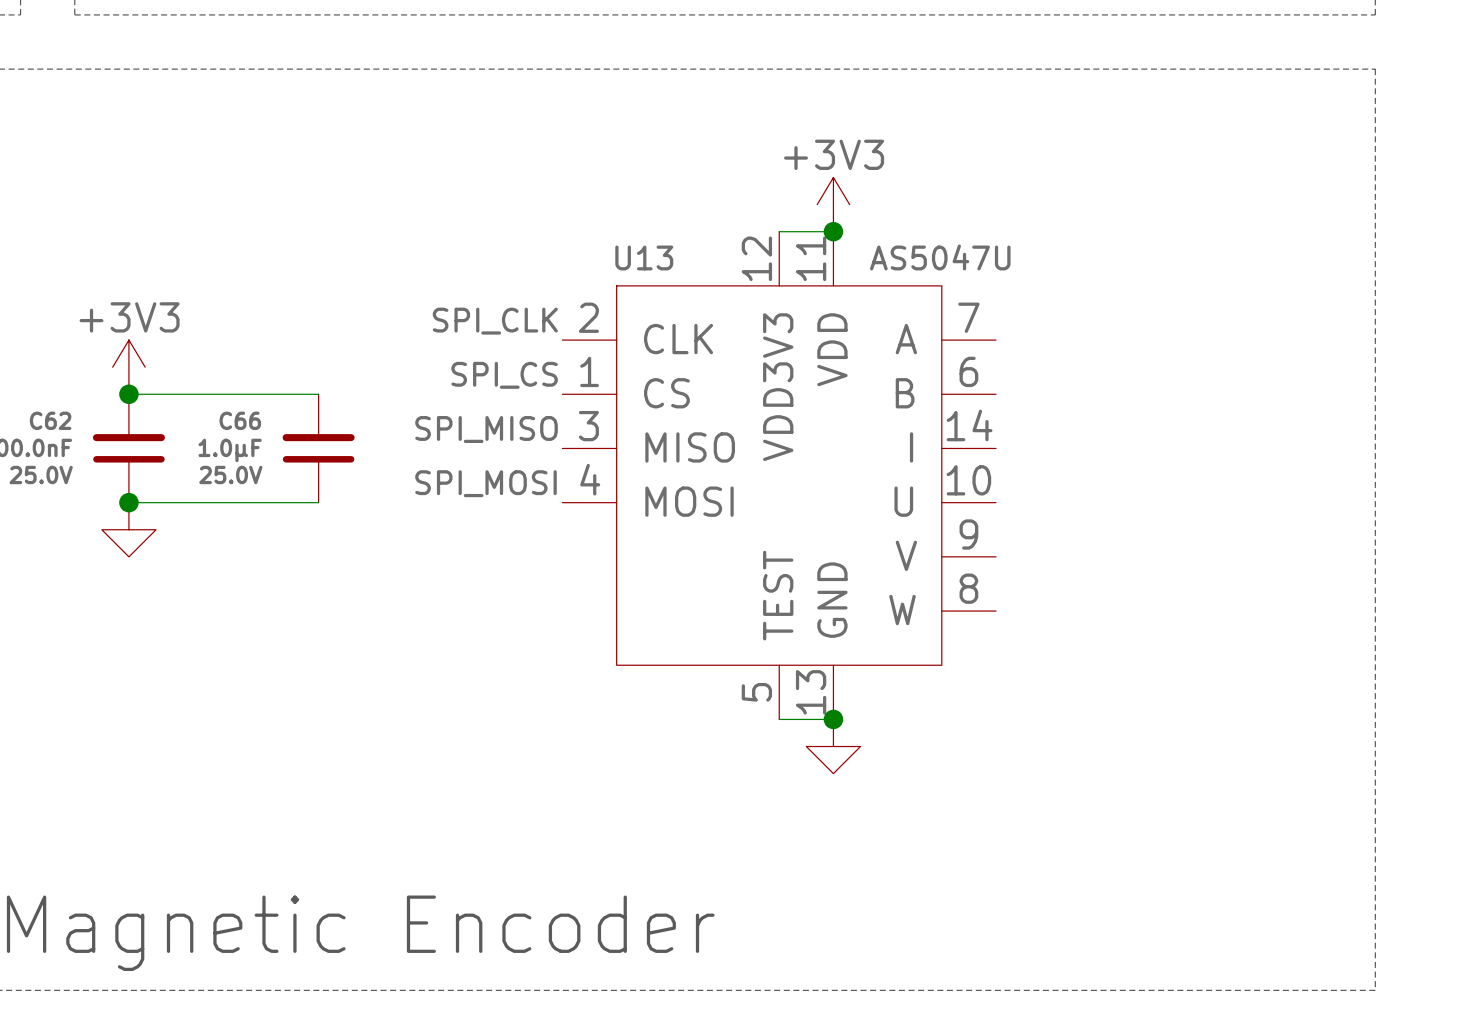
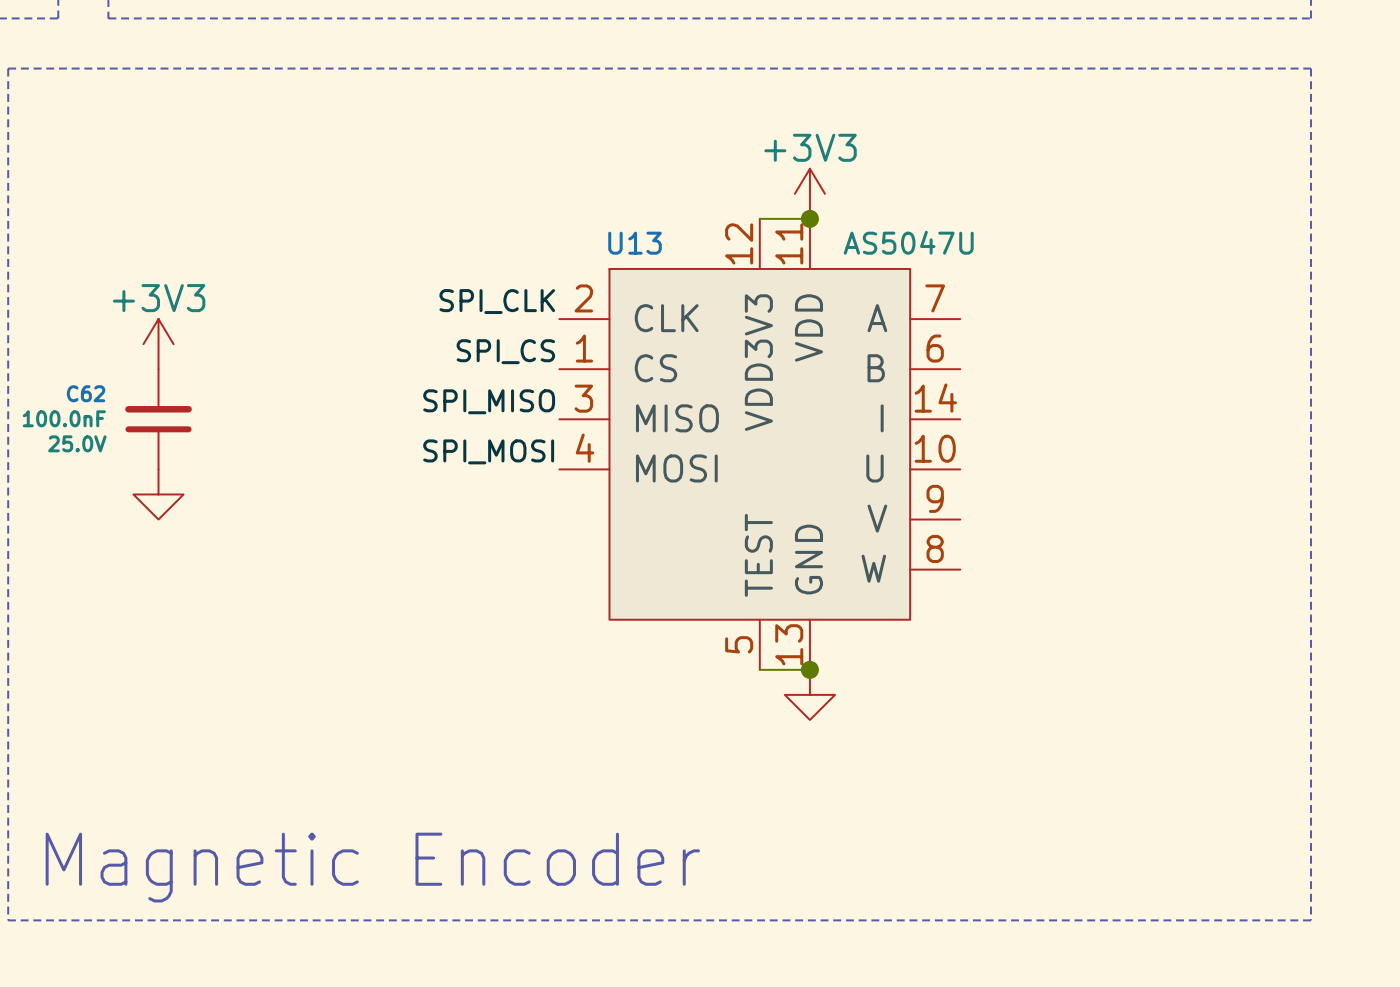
wire: (128, 394) (318, 394) -> none
junction: (128, 394) -> none
C66: 1.0μF (318, 448) -> none
wire: (128, 502) (318, 502) -> none
junction: (128, 502) -> none

